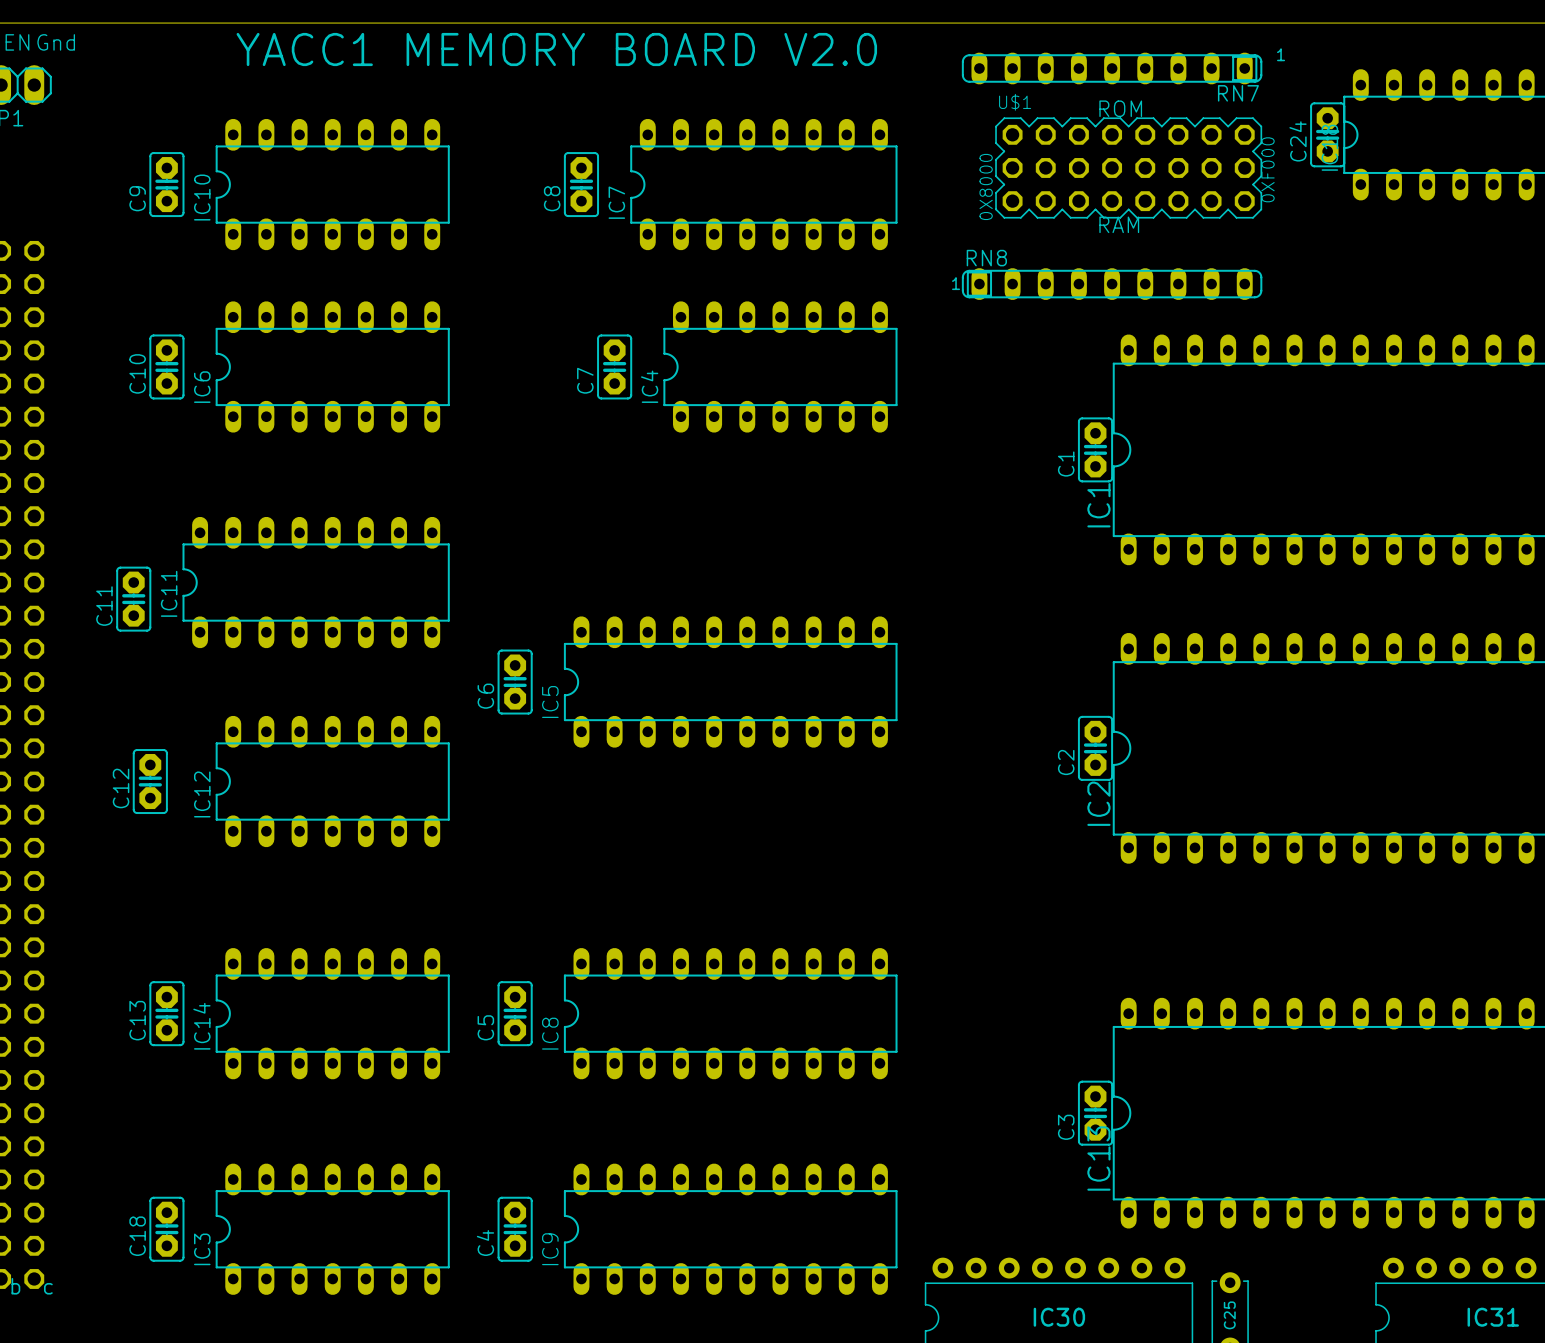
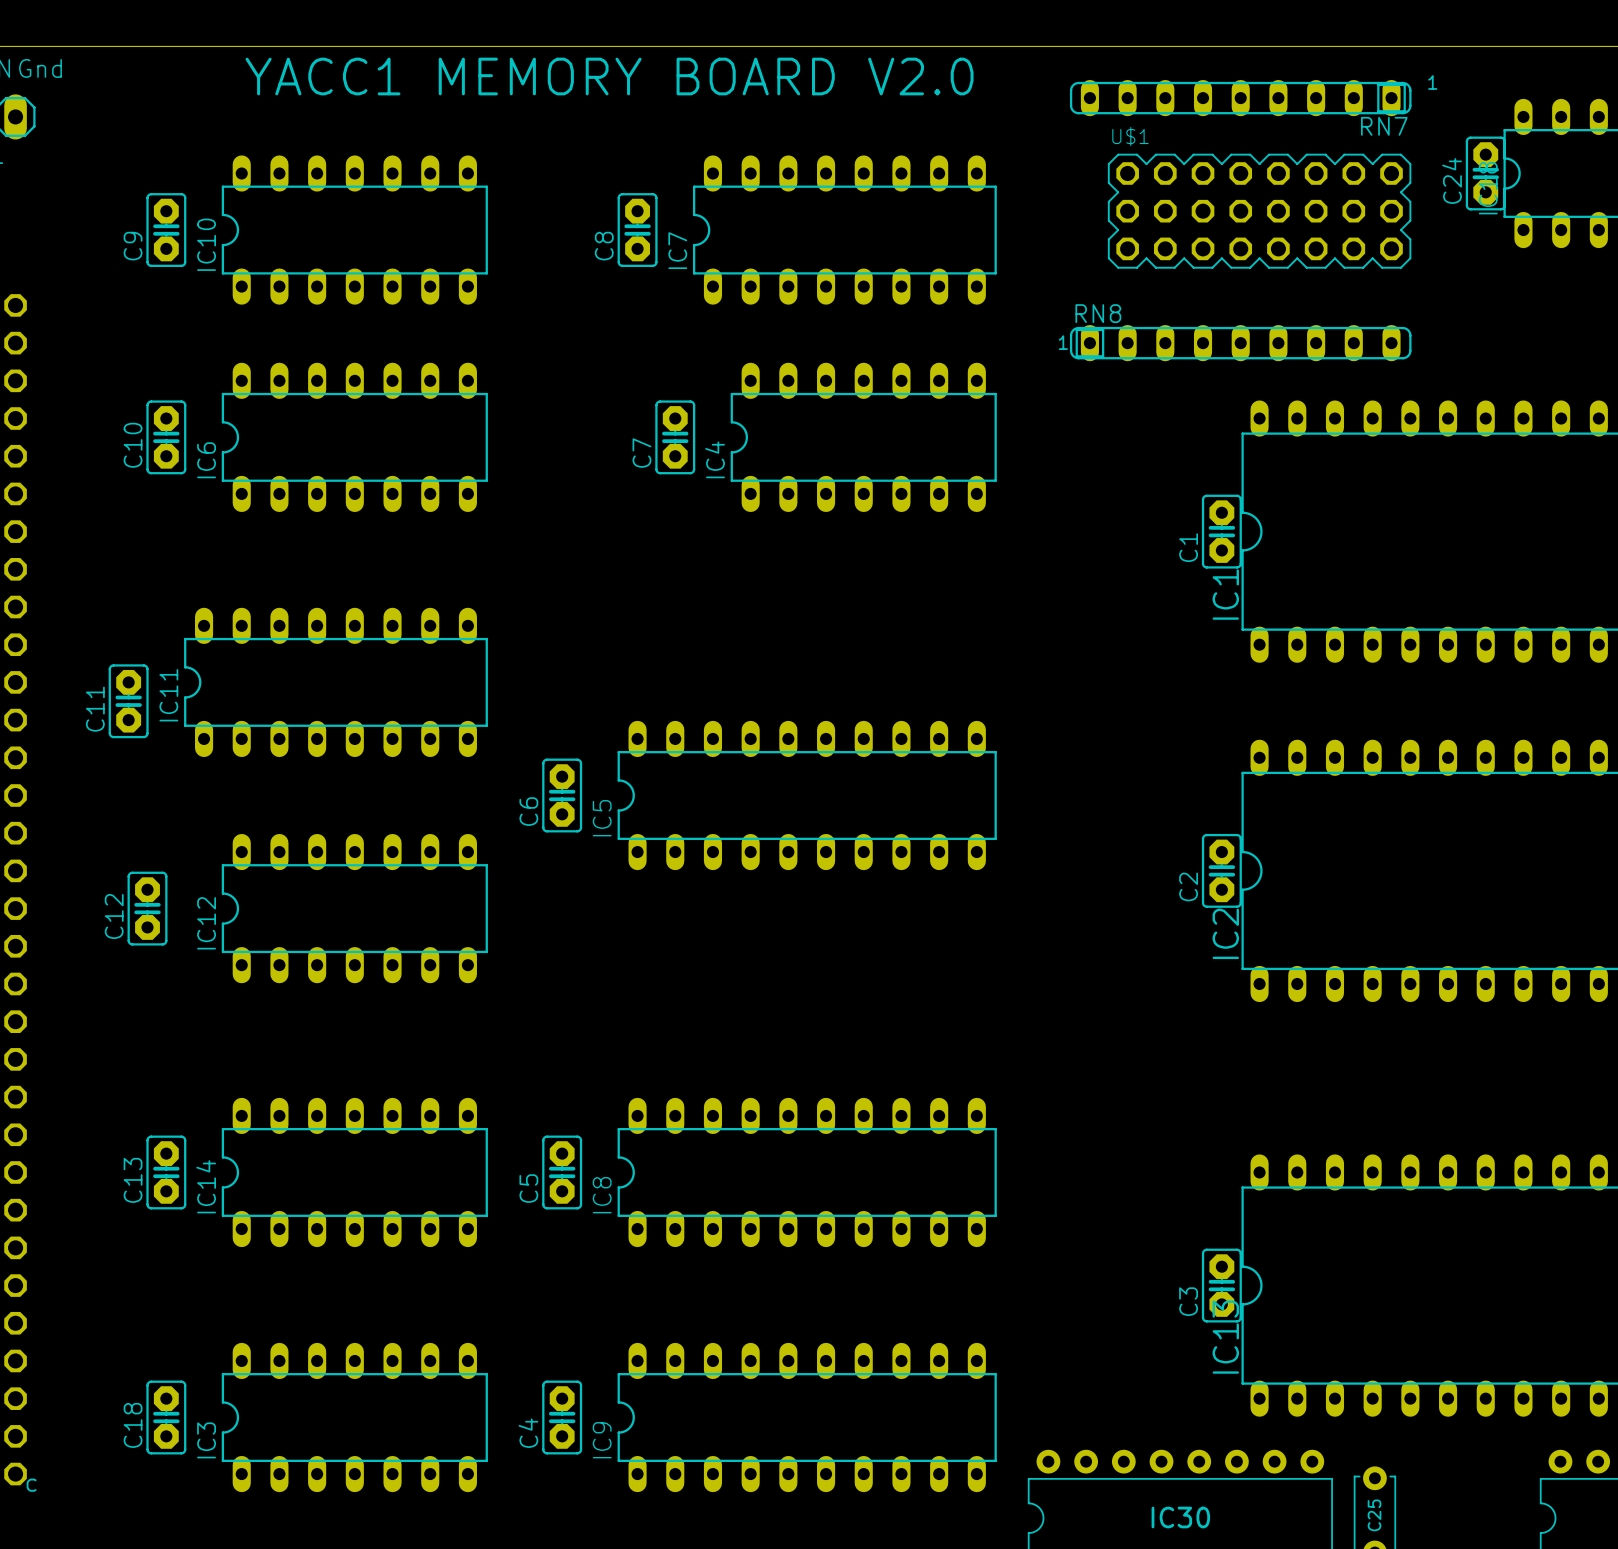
text: ROM (1120, 108) -> none
text: 0XF000 (1268, 169) -> none
text: 0X8000 (986, 186) -> none
text: RAM (1119, 224) -> none

